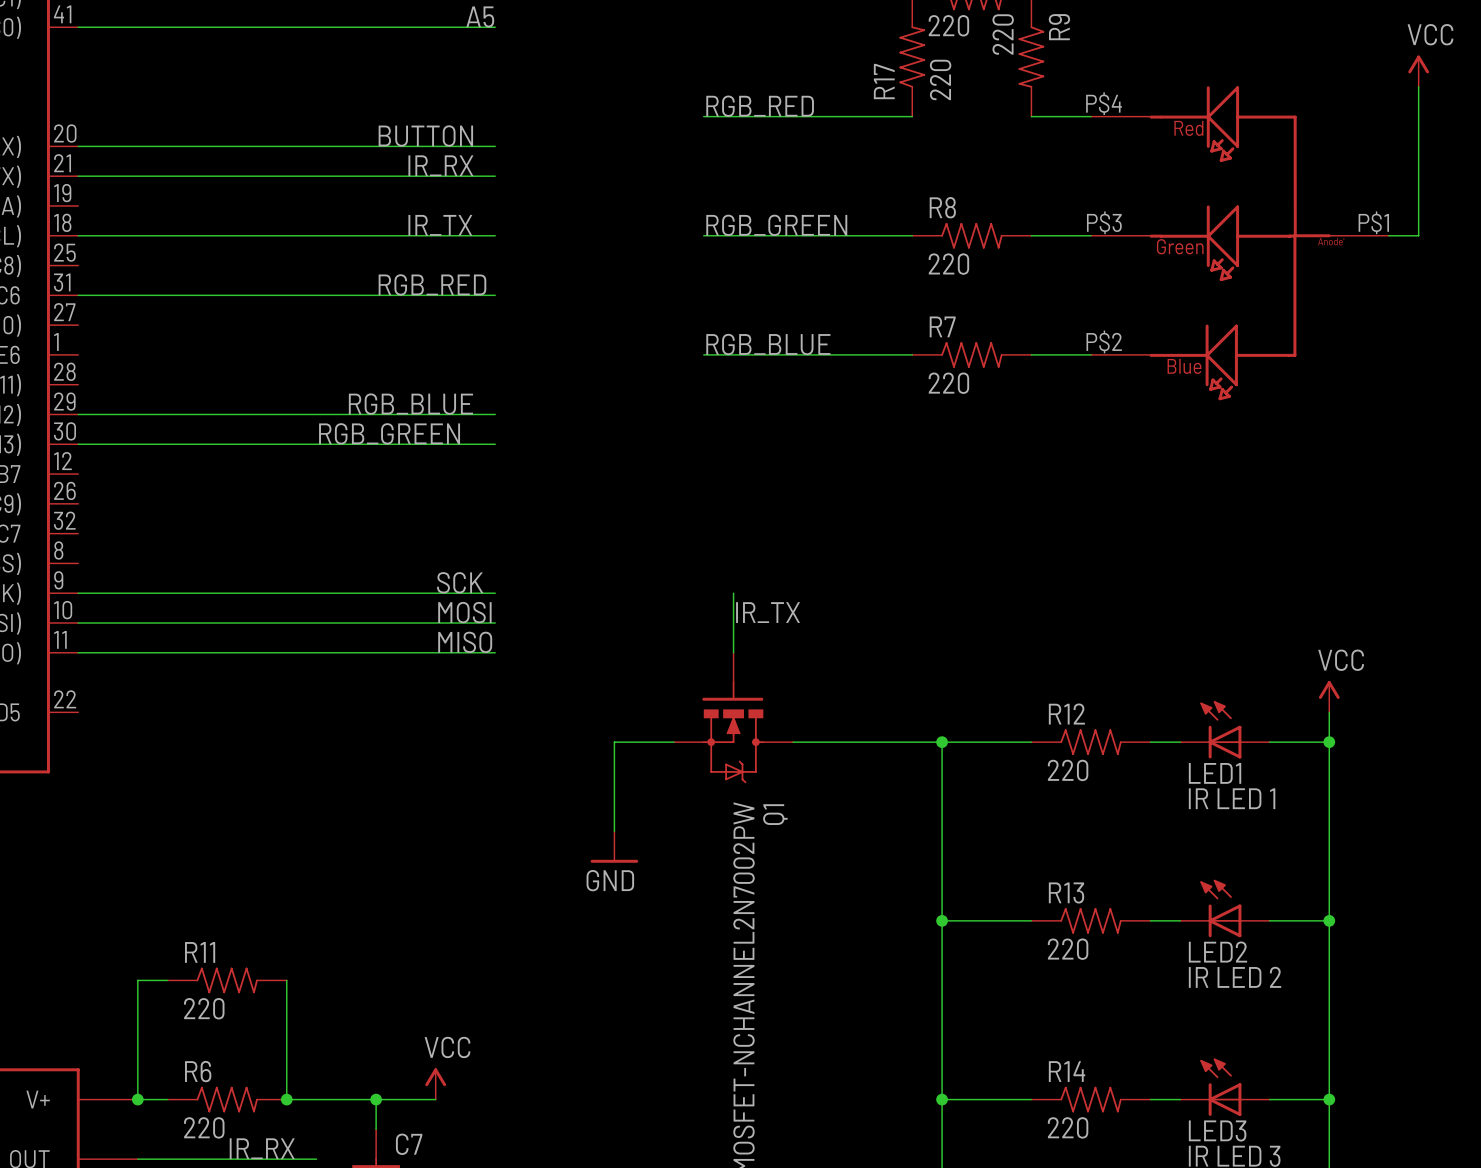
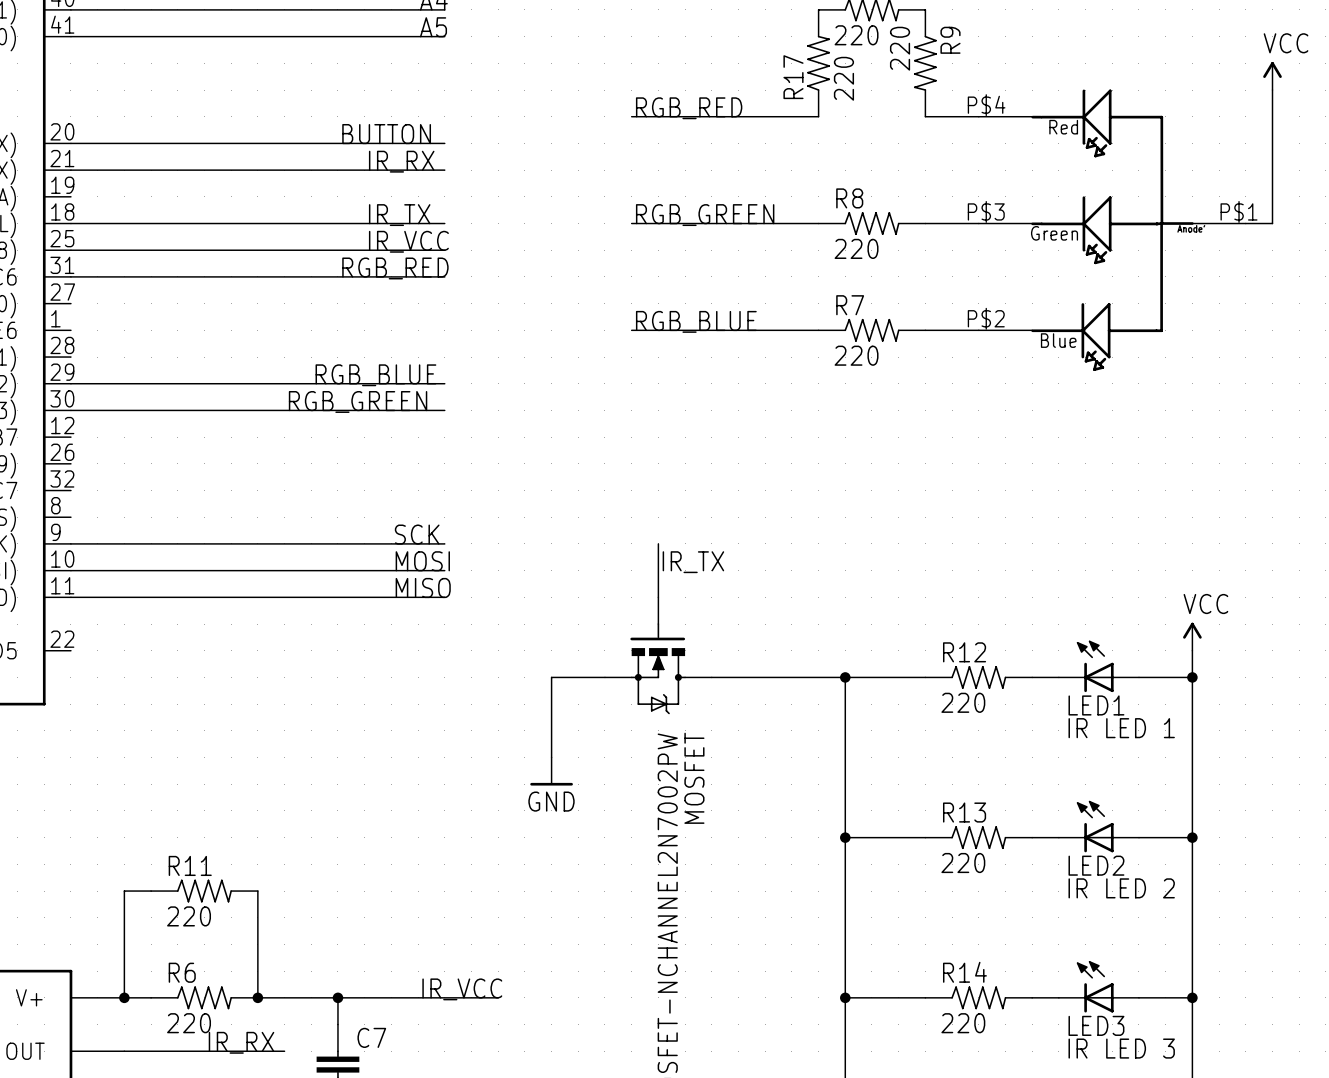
label: none -> IR_VCC (408, 241)
wire: none -> (70, 250) (444, 250)
Q1 name: Q1 (775, 814) -> MOSFET (694, 778)
power symbol: VCC (435, 1083) -> none
label: none -> IR_VCC (462, 989)
wire: none -> (391, 997) (498, 997)

